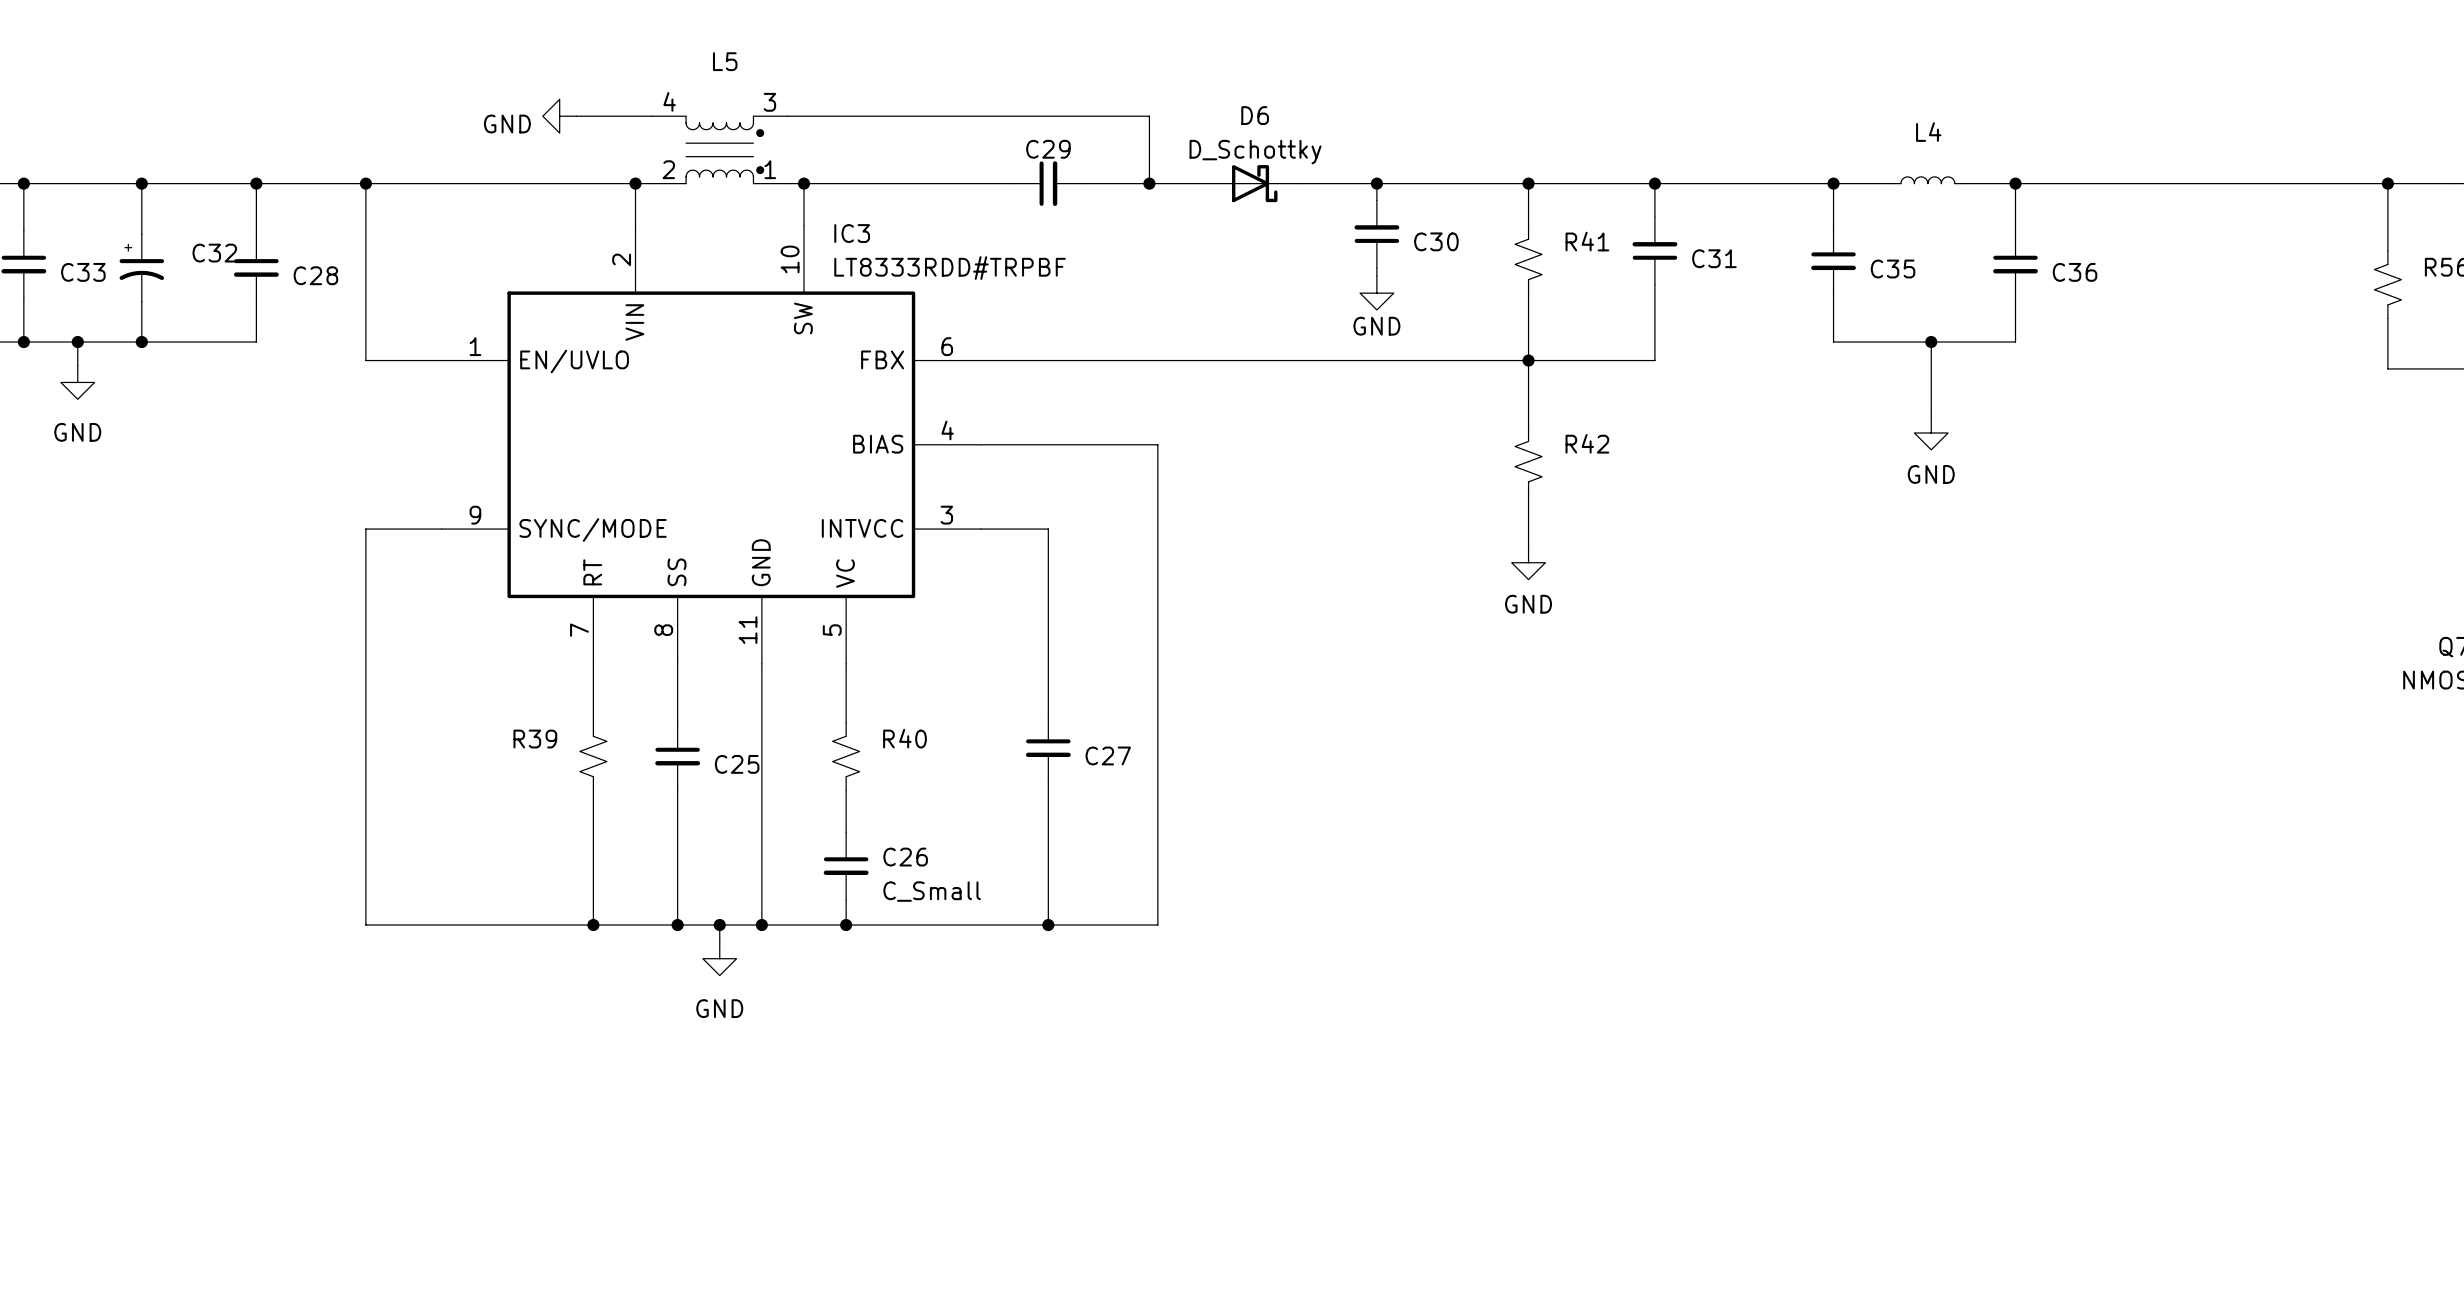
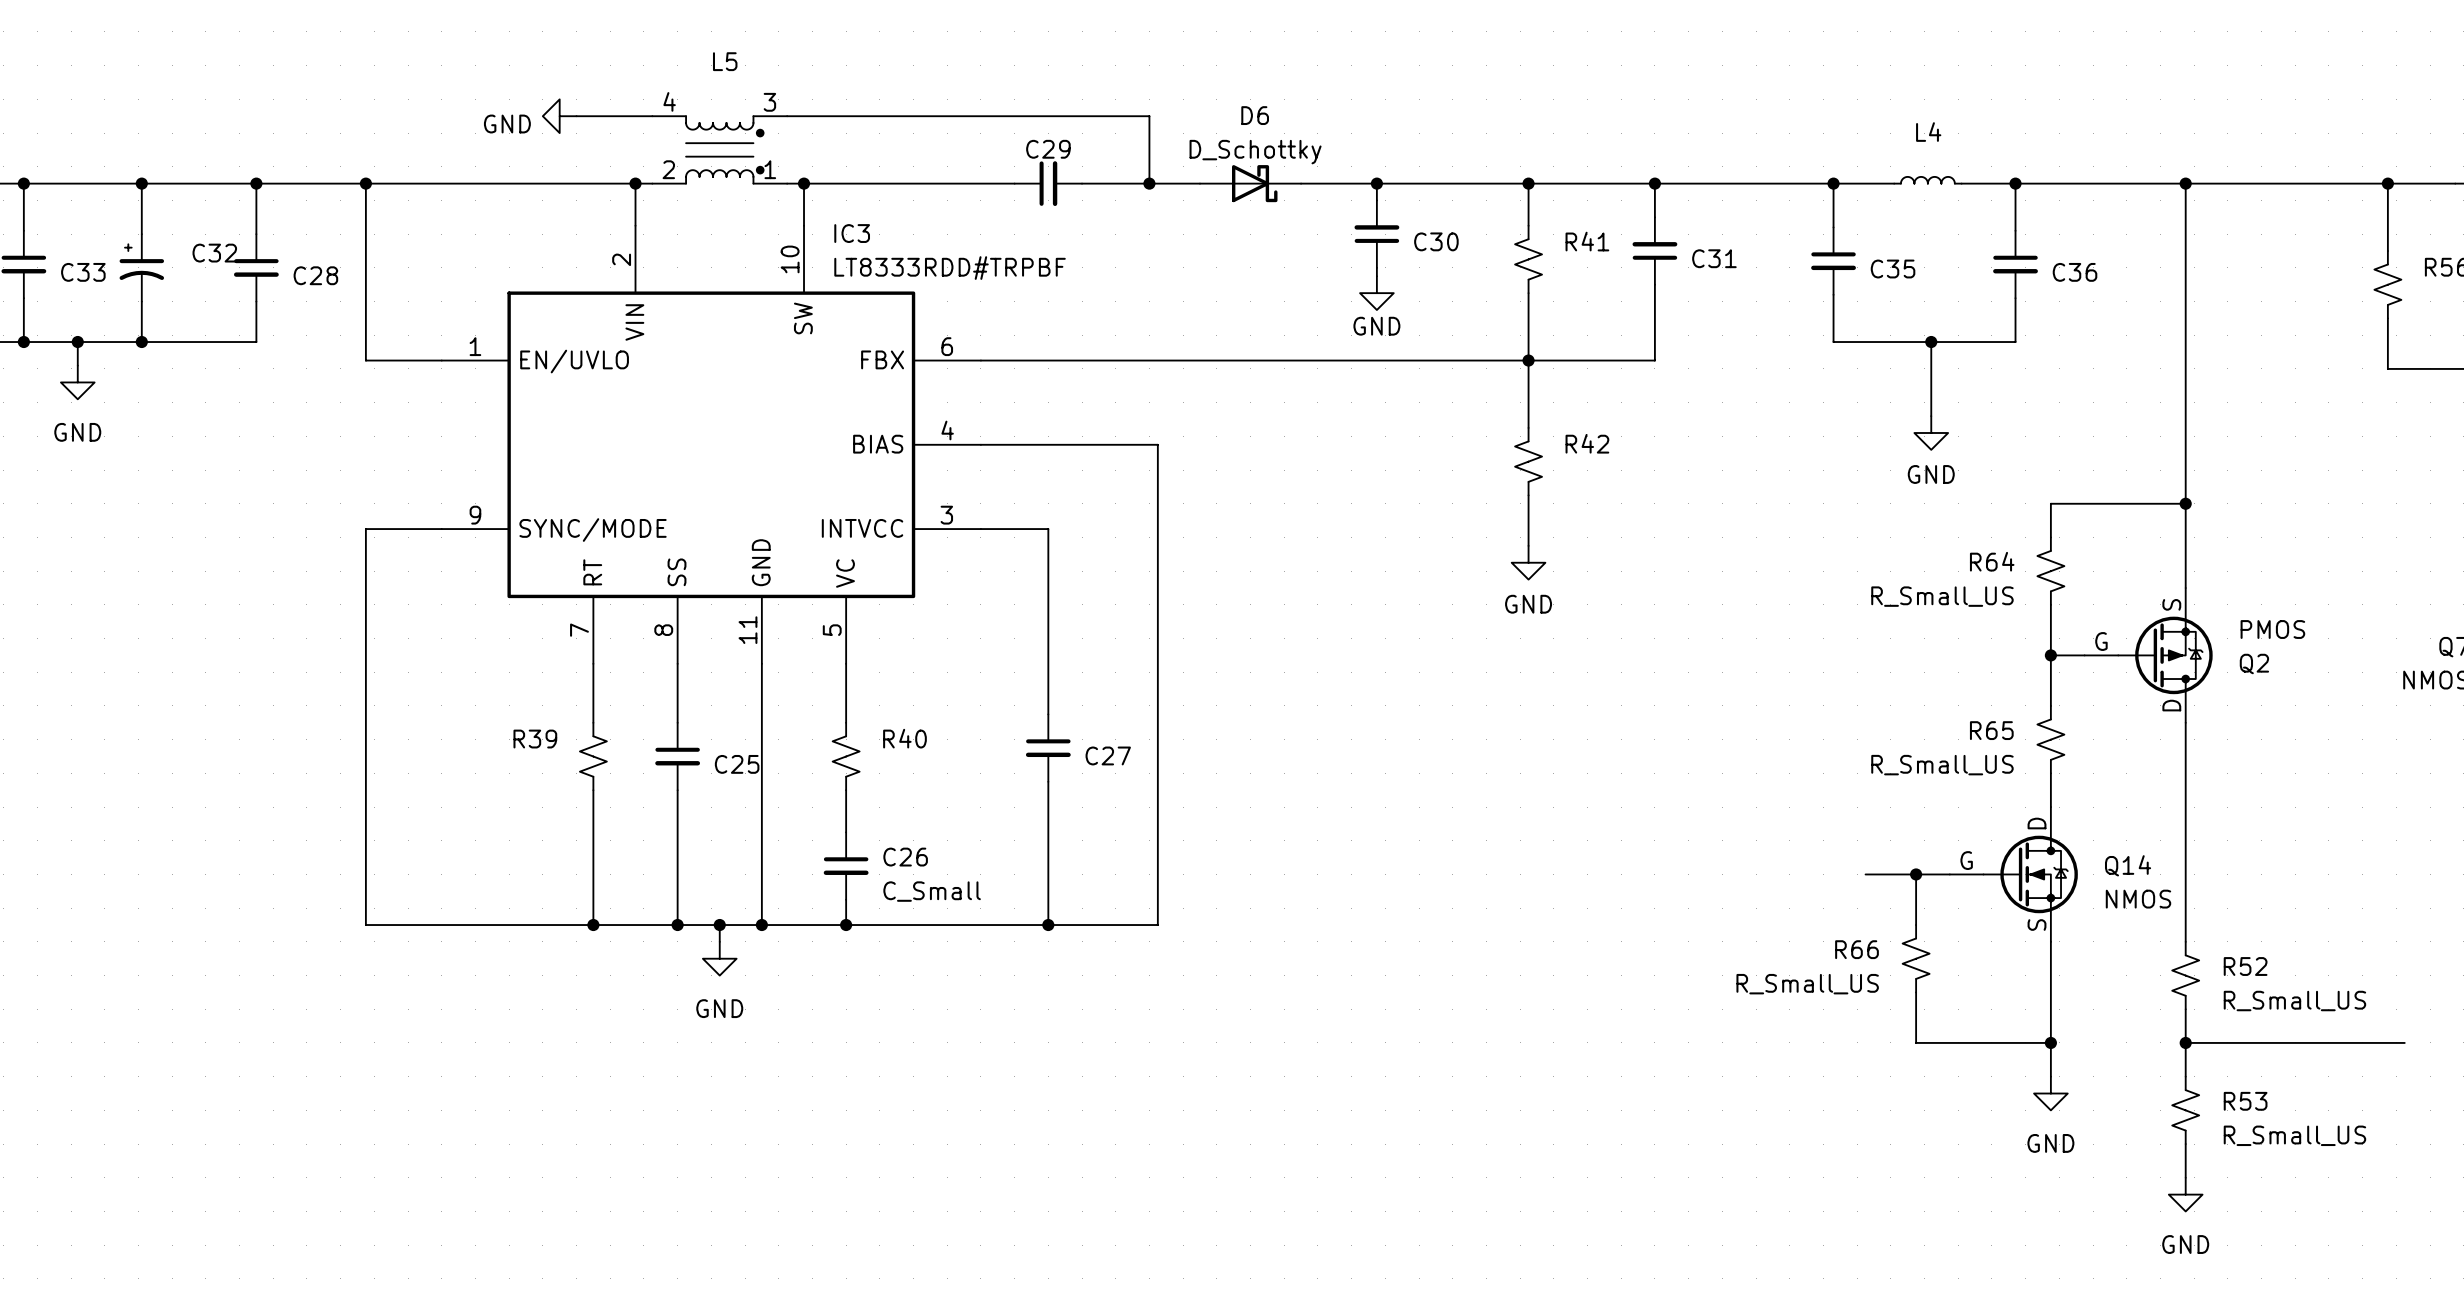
wire: none -> (2185, 183) (2185, 588)
junction: none -> (2185, 183)
wire: none -> (2185, 503) (2050, 503) (2050, 537)
junction: none -> (2185, 503)
R64: none -> R_Small_US (2050, 571)
wire: none -> (2050, 604) (2050, 705)
wire: none -> (2050, 655) (2084, 655)
junction: none -> (2050, 655)
Q2: none -> PMOS (2148, 655)
wire: none -> (2185, 722) (2185, 941)
R65: none -> R_Small_US (2050, 739)
wire: none -> (2050, 773) (2050, 807)
wire: none -> (1865, 874) (1949, 874)
wire: none -> (1916, 874) (1916, 925)
junction: none -> (1916, 874)
Q14: none -> NMOS (2013, 874)
wire: none -> (2050, 941) (2050, 1076)
R66: none -> R_Small_US (1916, 958)
R52: none -> R_Small_US (2185, 975)
wire: none -> (1916, 992) (1916, 1042) (2050, 1042)
wire: none -> (2185, 1009) (2185, 1076)
junction: none -> (2050, 1042)
wire: none -> (2185, 1042) (2404, 1042)
junction: none -> (2185, 1042)
power symbol: none -> GND (2050, 1093)
R53: none -> R_Small_US (2185, 1110)
wire: none -> (2185, 1144) (2185, 1177)
power symbol: none -> GND (2185, 1194)

